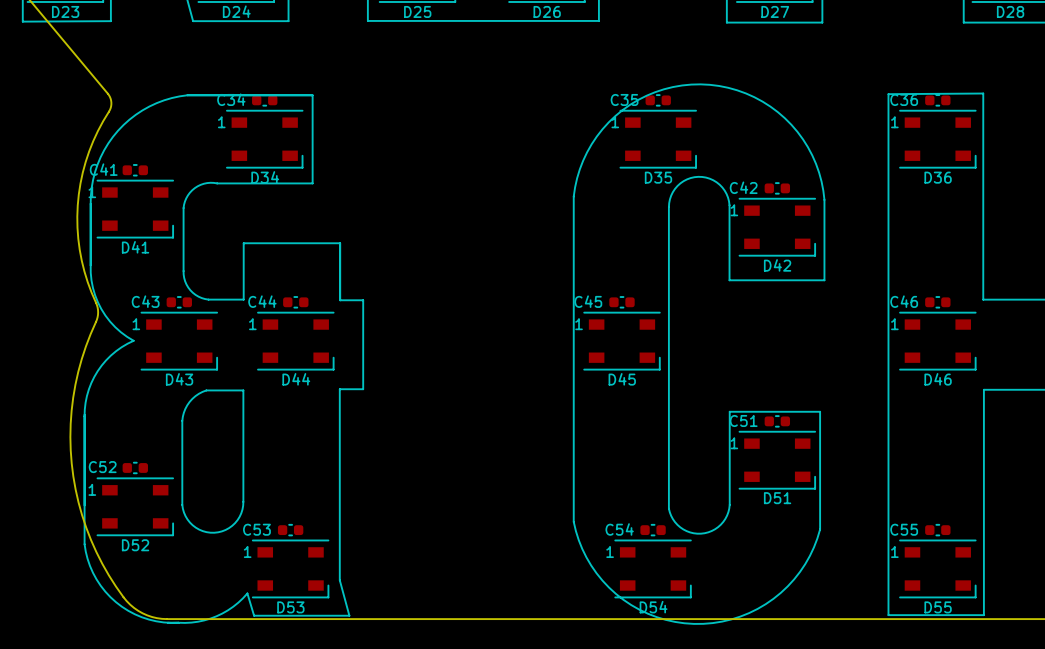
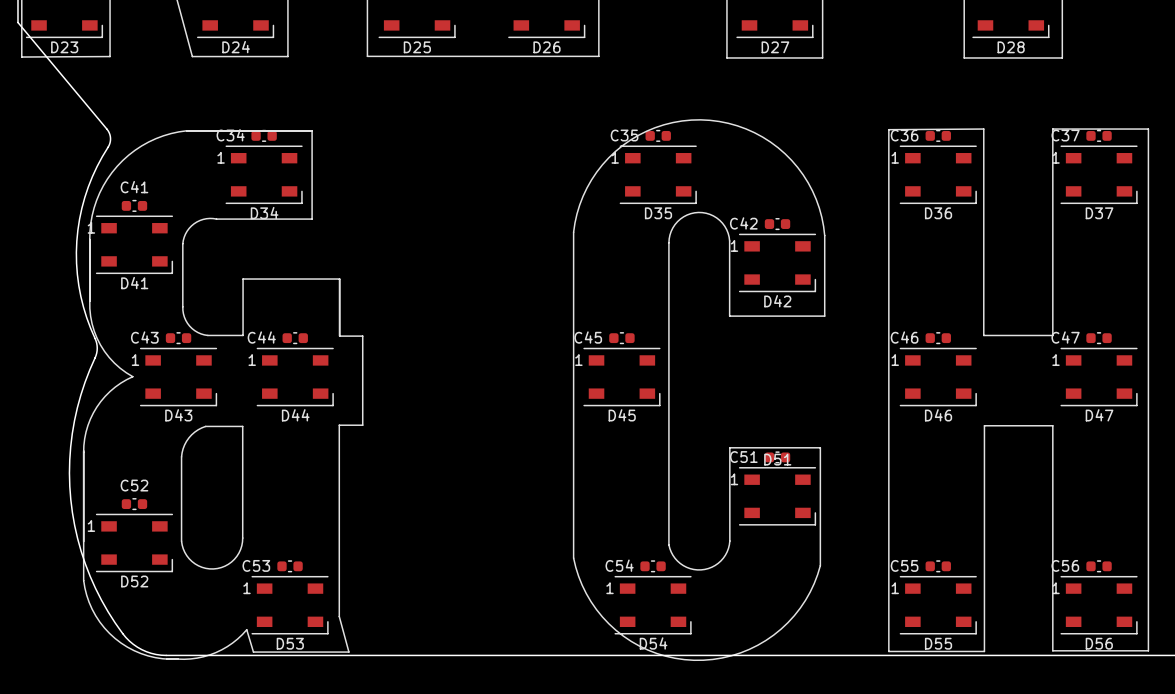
C41 name position: C41 (103, 169) -> C41 (134, 187)
C52 name position: C52 (102, 467) -> C52 (134, 485)
D51 name position: D51 (777, 498) -> D51 (777, 459)

